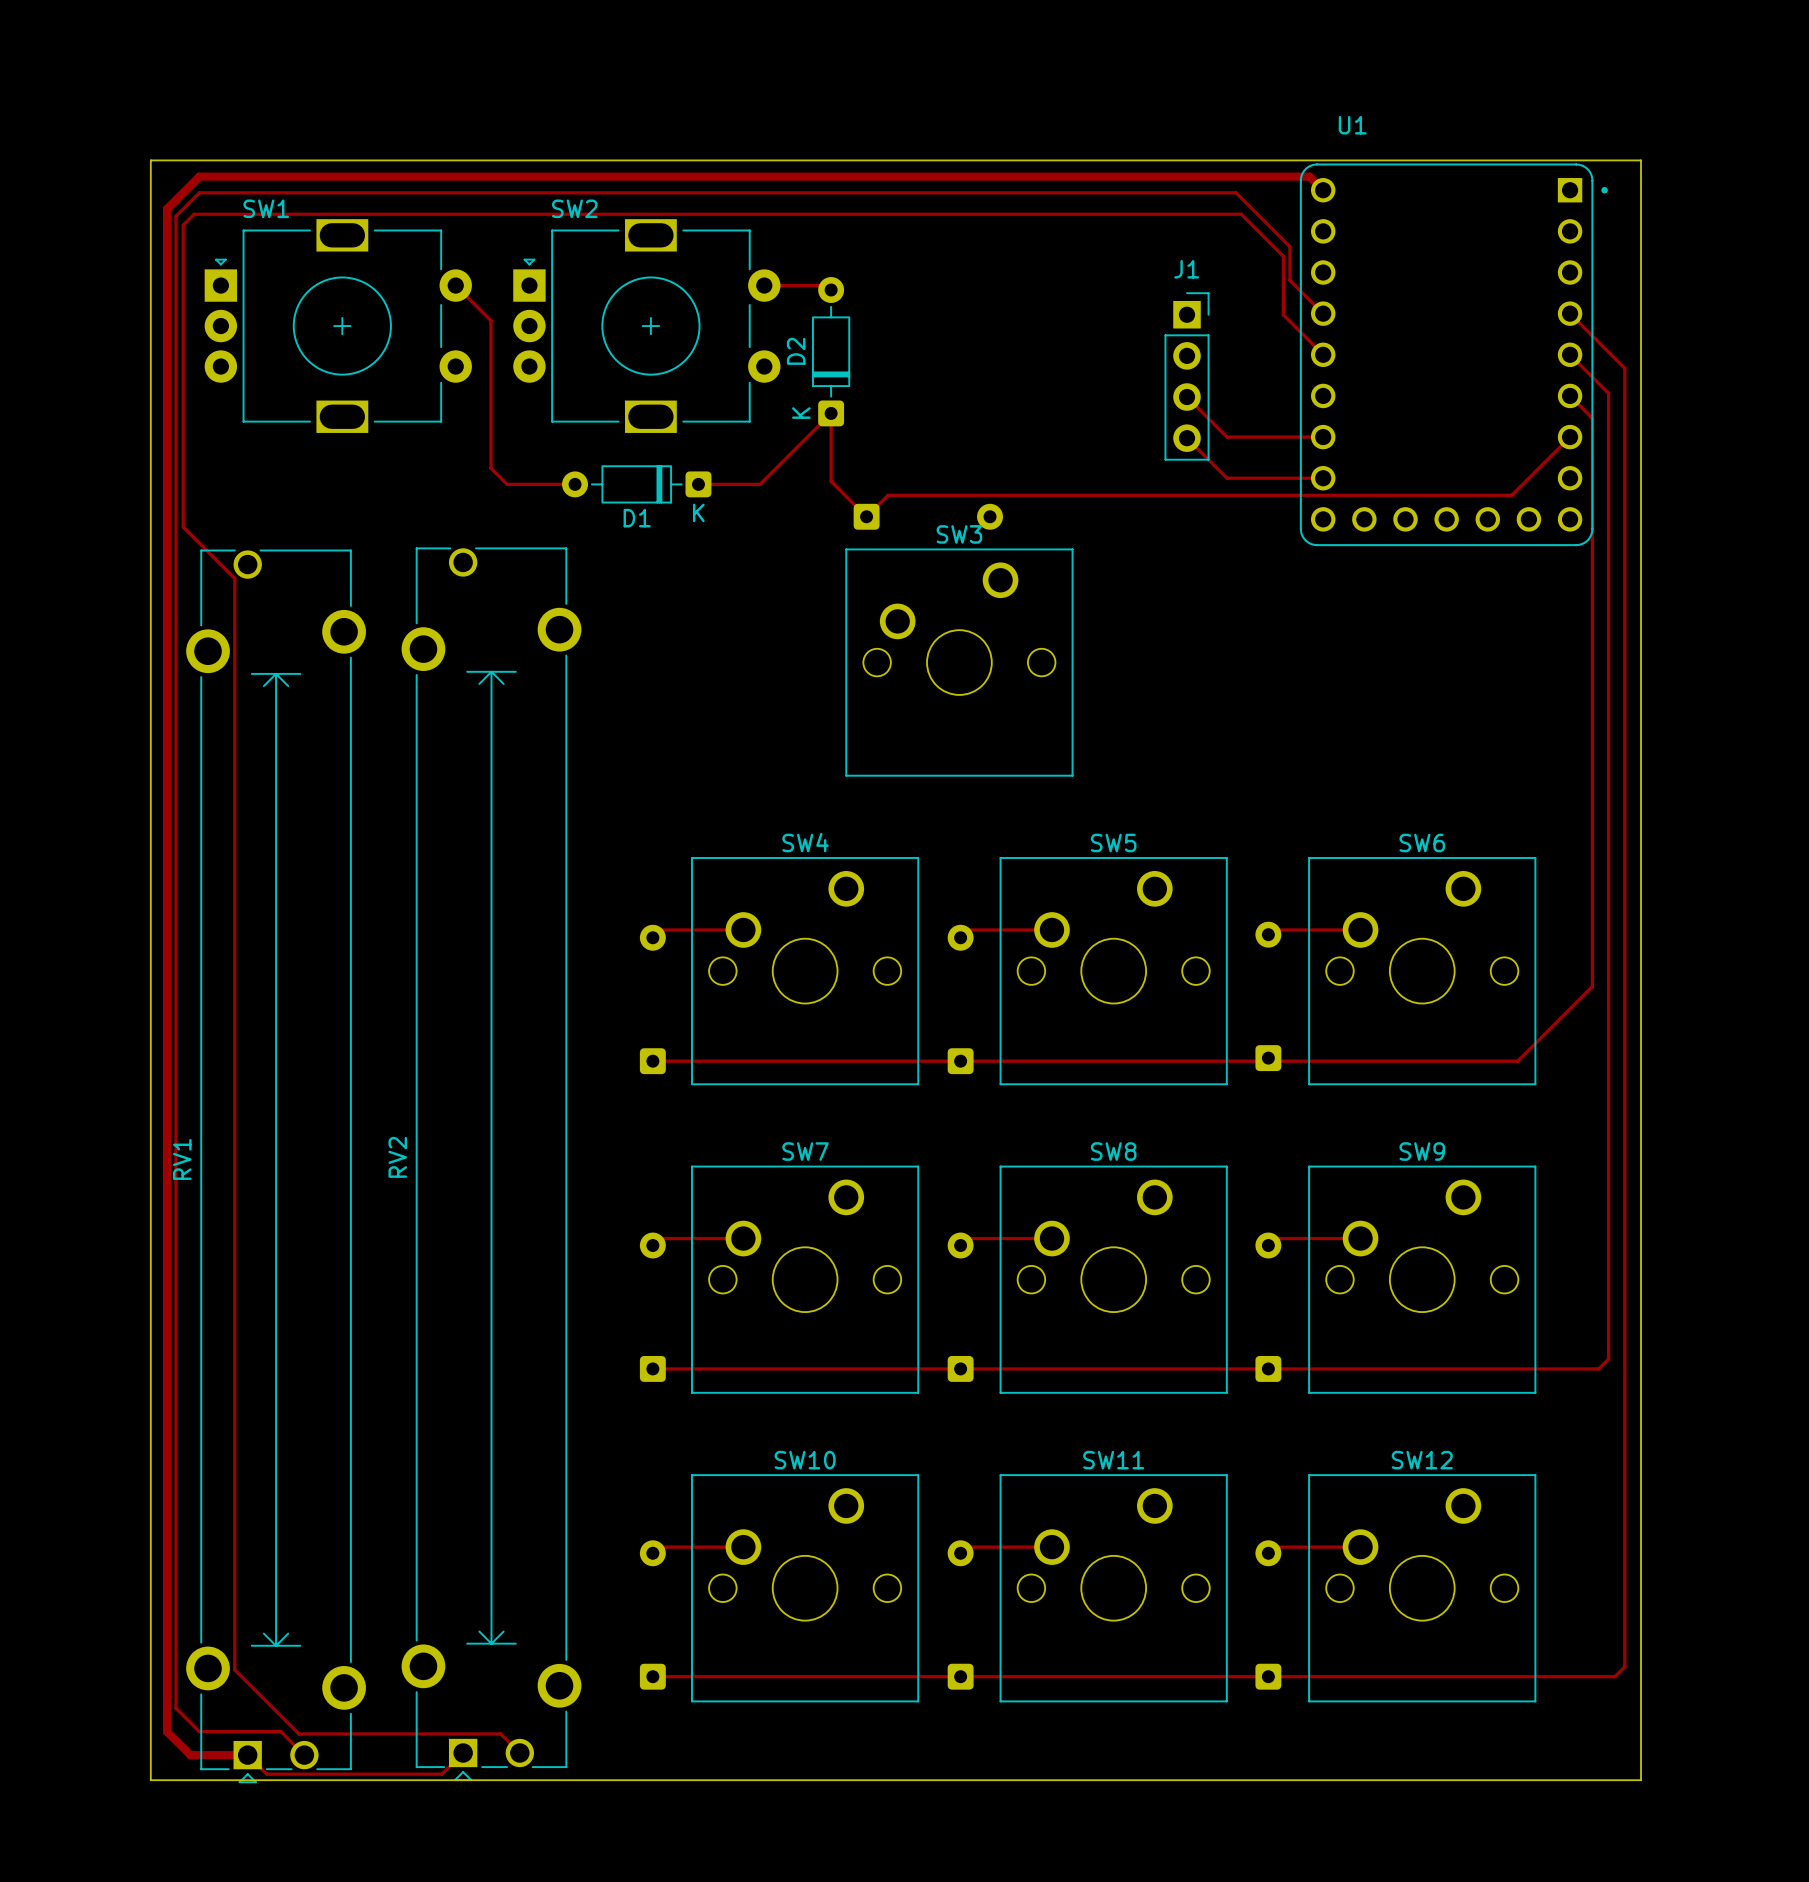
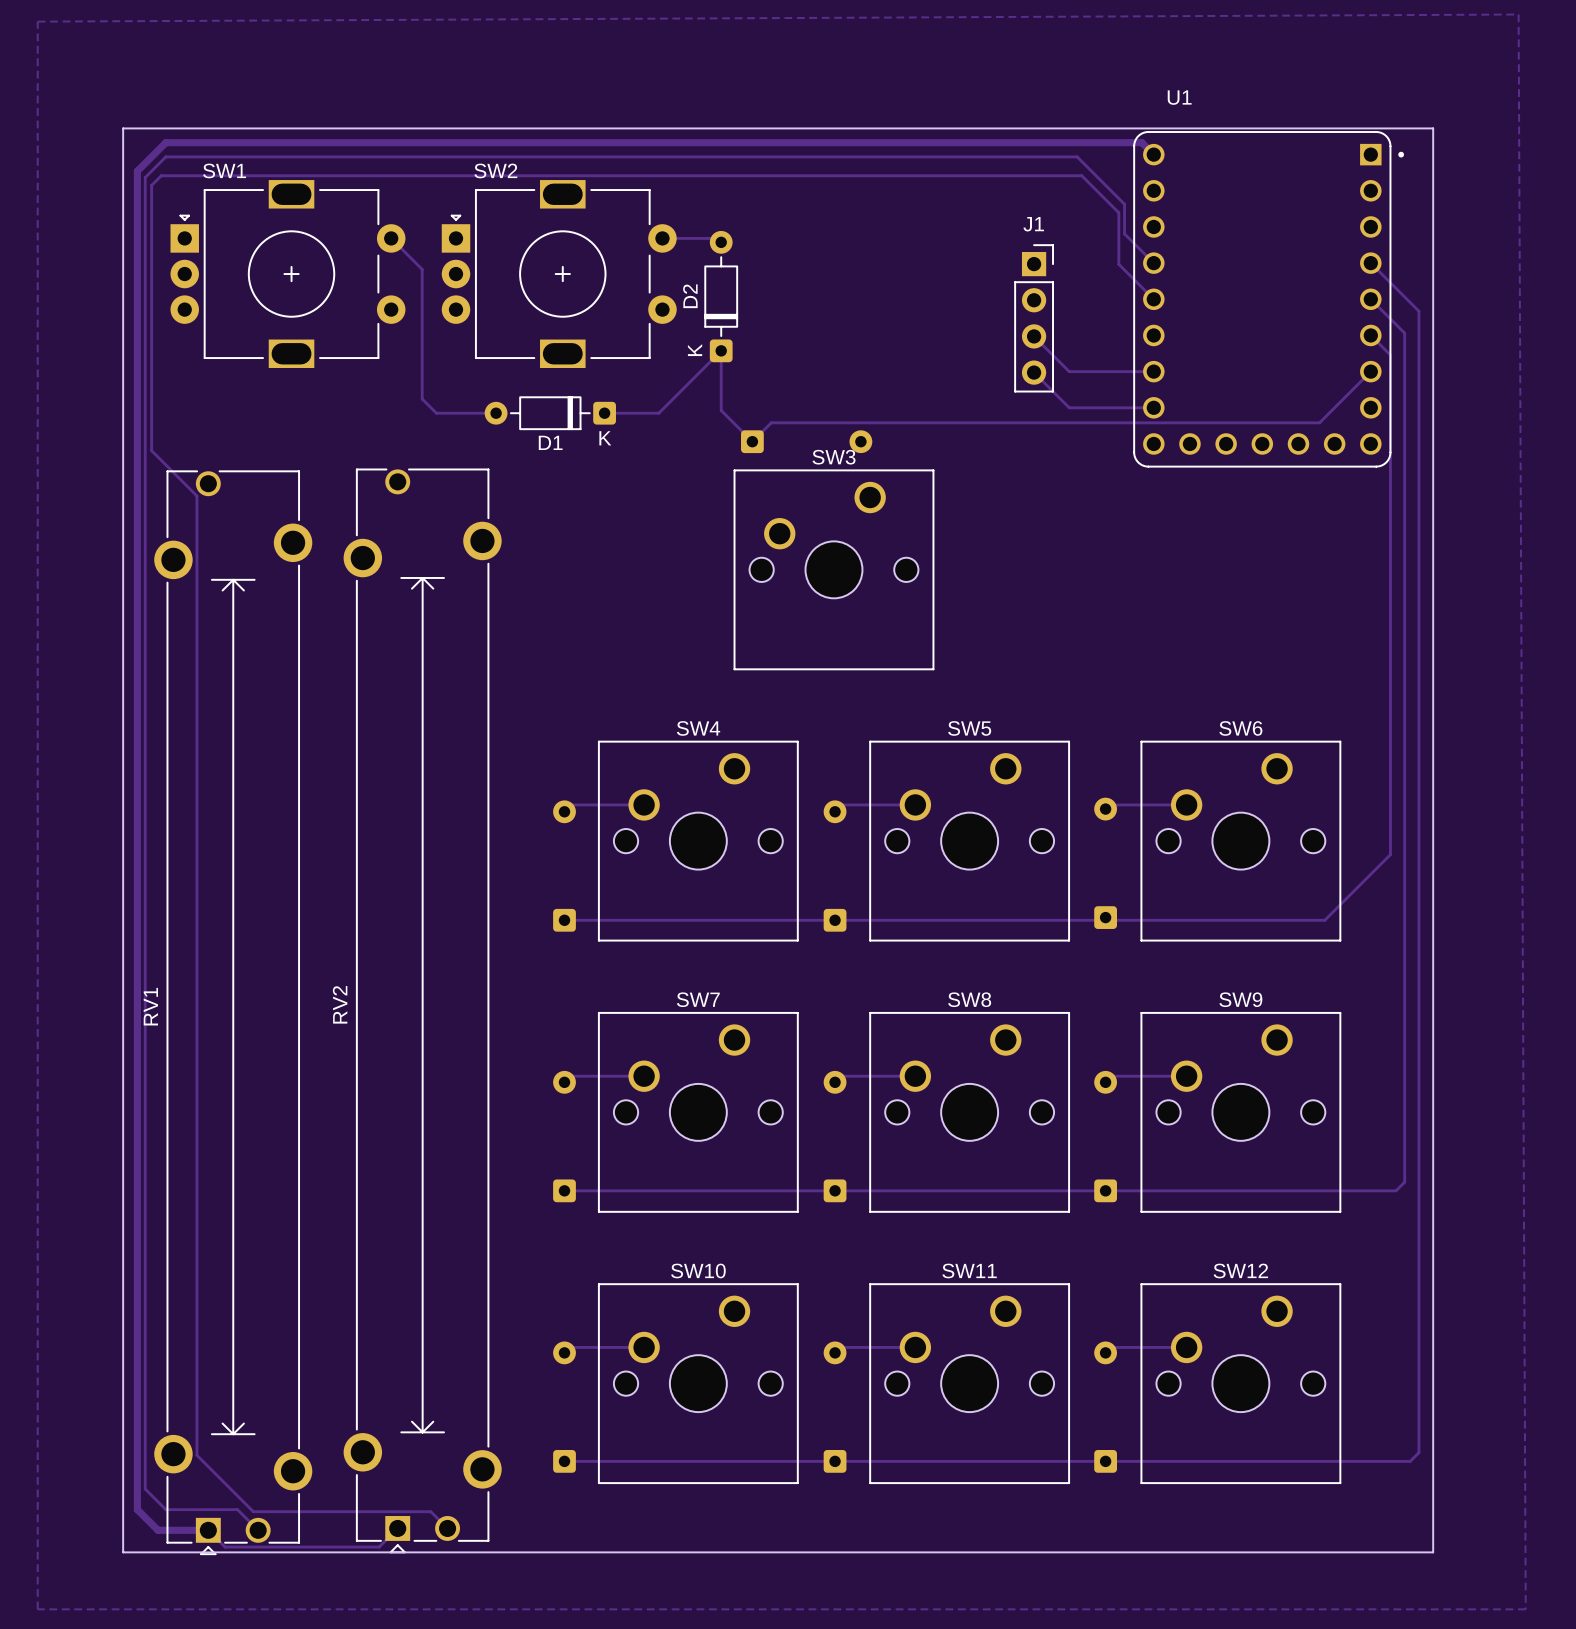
zone outline: none -> (1518, 14) (37, 21) (37, 1609) (1525, 1609) (1518, 14)

